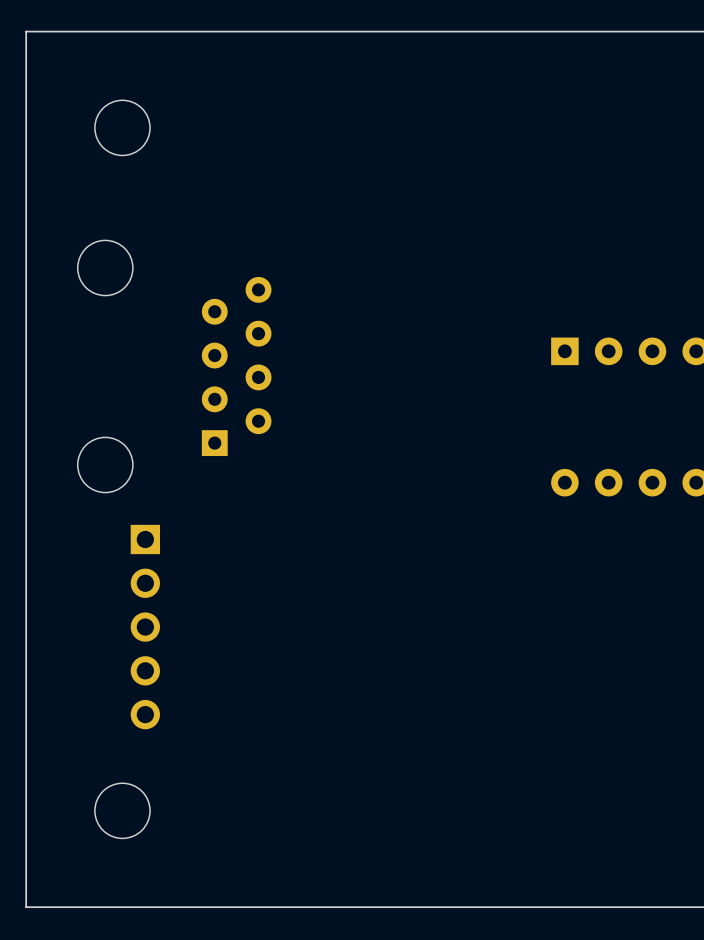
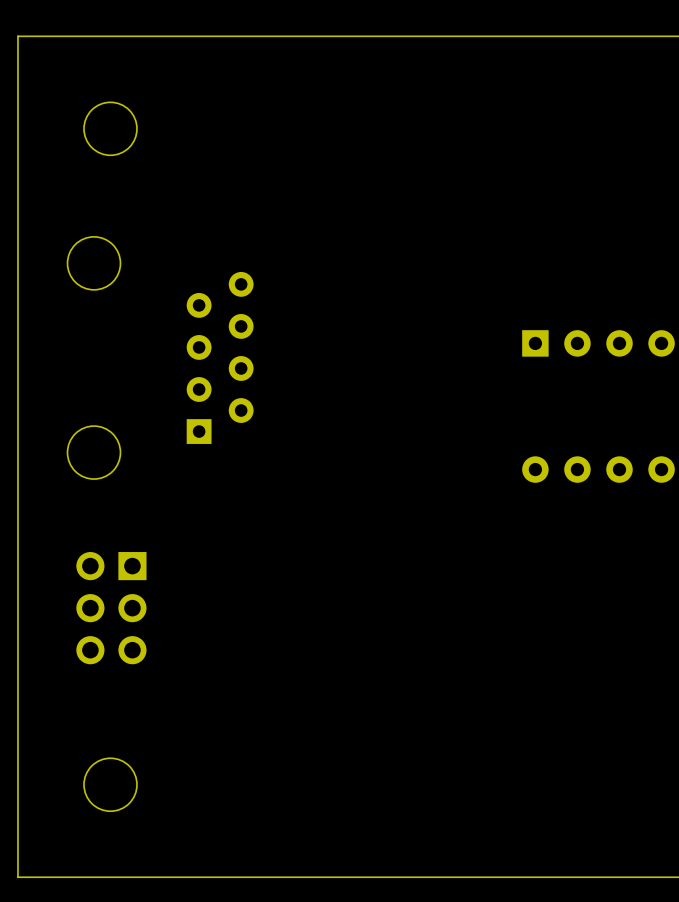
part: none -> (111, 608)
part: (145, 627) -> none

